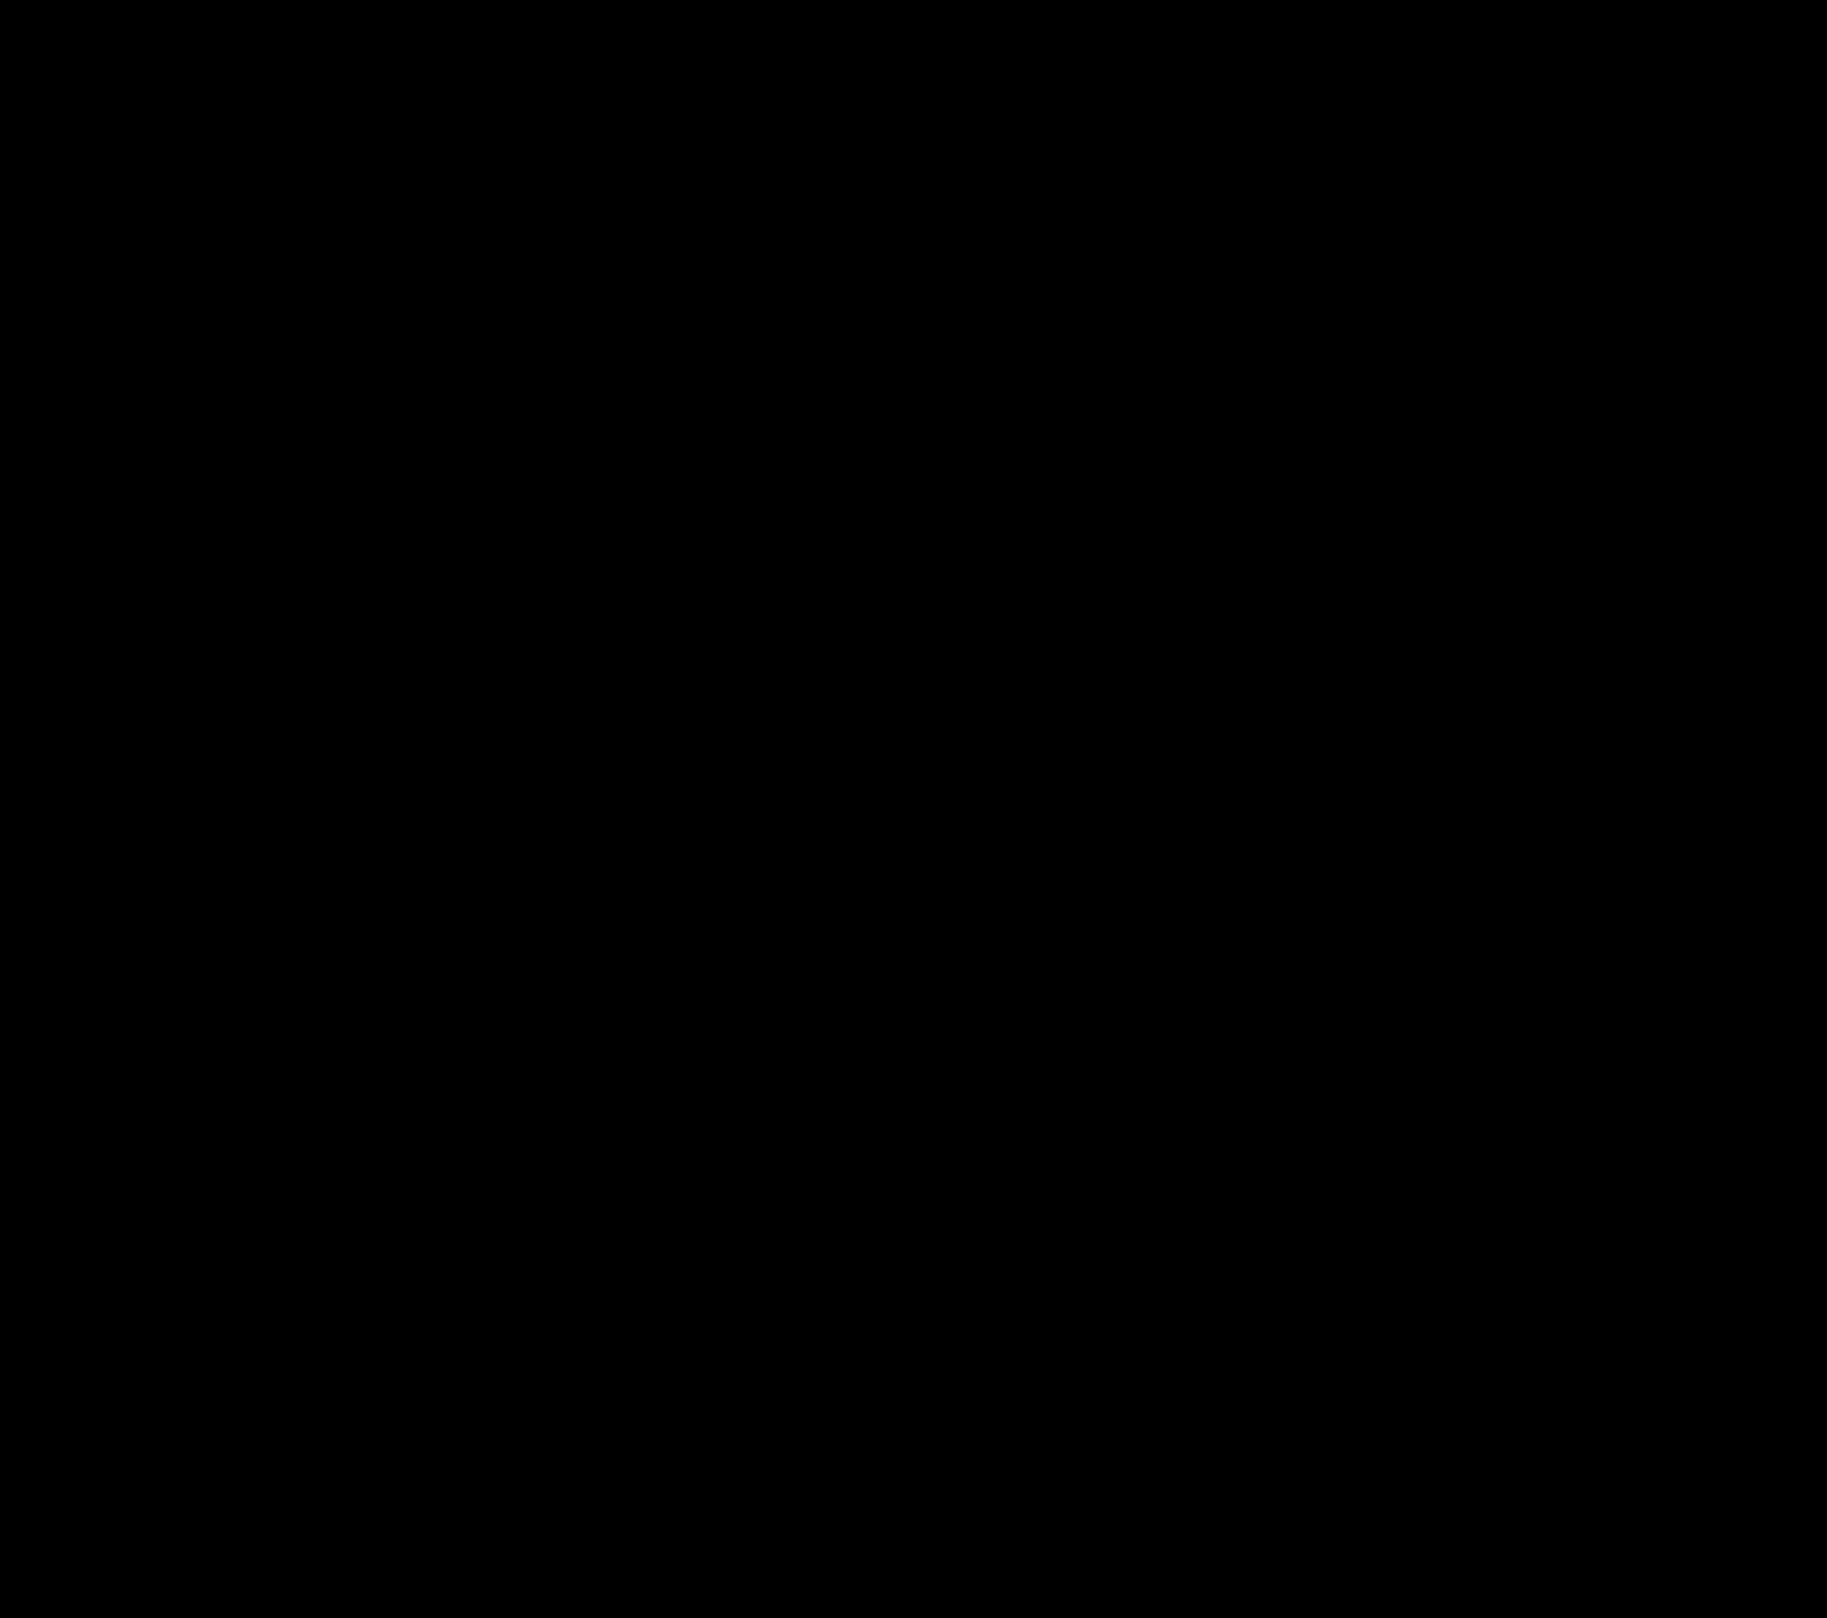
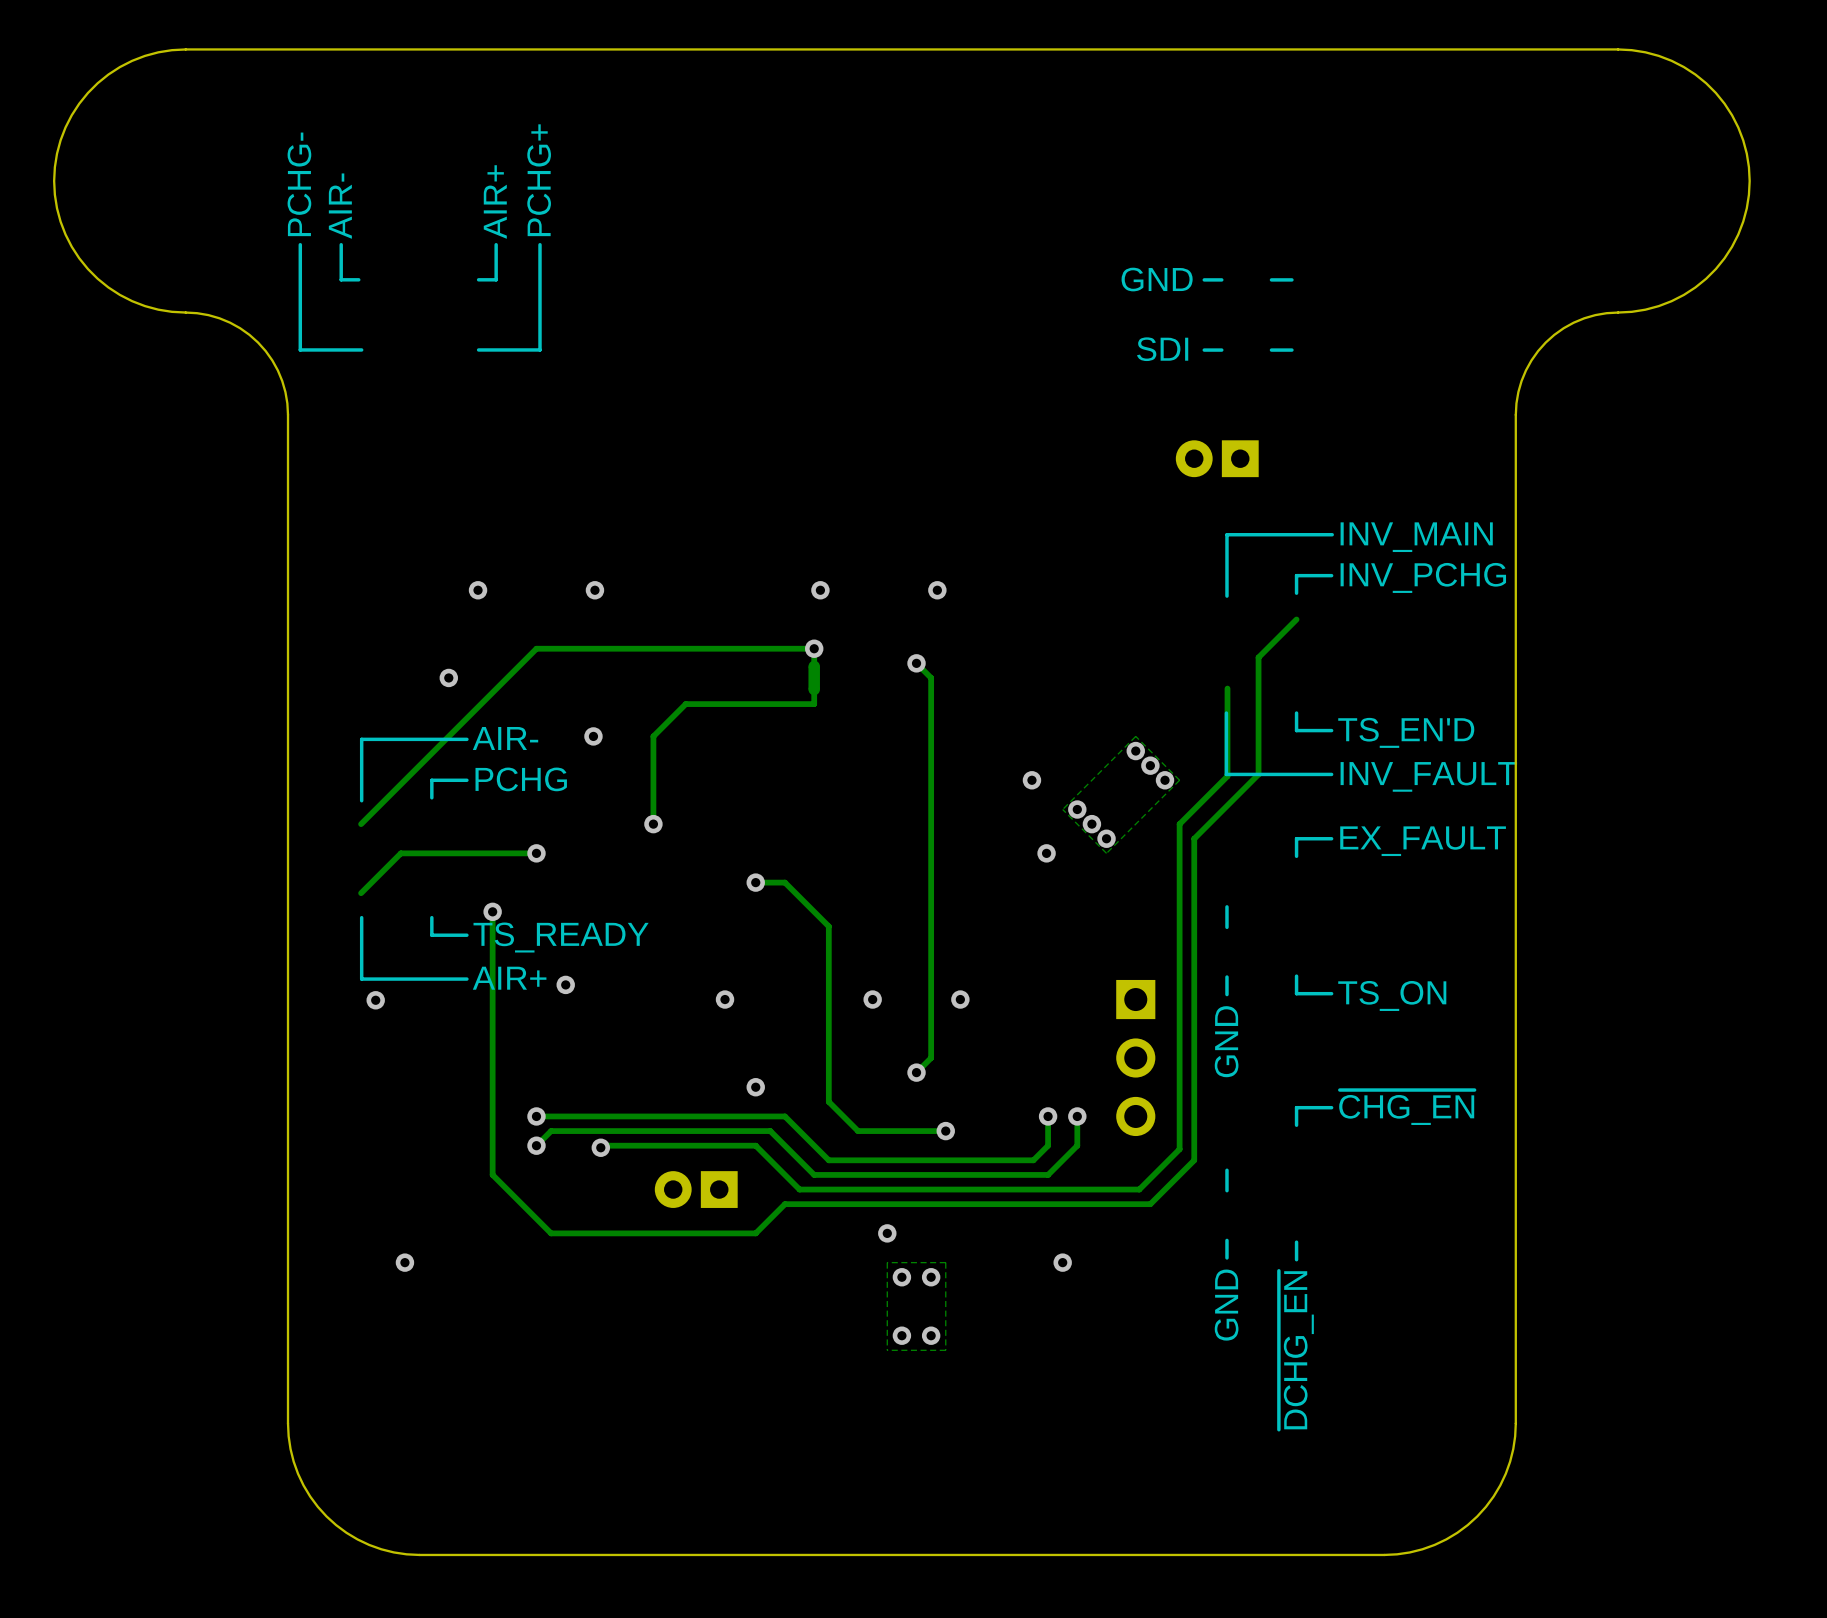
board edge: none -> (1618, 49) (185, 49) (158, 52) (132, 60) (108, 74) (87, 92) (65, 127) (57, 153) (54, 181) (60, 221) (79, 258) (97, 278) (132, 301) (158, 309) (208, 315) (240, 328) (265, 351) (277, 370) (285, 392) (288, 414) (288, 1423) (290, 1449) (298, 1473) (310, 1496) (336, 1525) (357, 1539) (381, 1549) (419, 1554) (1384, 1554) (1422, 1549) (1446, 1539) (1467, 1525) (1485, 1506) (1500, 1485) (1510, 1461) (1515, 1423) (1515, 414) (1518, 392) (1531, 360) (1545, 342) (1563, 328) (1595, 315) (1631, 311) (1658, 306) (1683, 294) (1706, 278) (1732, 246) (1743, 221) (1748, 194) (1748, 167) (1743, 140) (1732, 115) (1715, 92) (1695, 74) (1671, 60) (1645, 52) (1618, 49)
text: none -> PCHG+ (539, 180)
text: none -> PCHG- (299, 184)
text: none -> AIR+ (495, 202)
text: none -> AIR- (340, 206)
line: none -> (300, 244) (300, 349) (361, 349)
line: none -> (341, 244) (341, 279) (358, 279)
line: none -> (496, 244) (496, 279) (478, 279)
line: none -> (540, 244) (540, 349) (478, 349)
text: none -> GND (1157, 279)
line: none -> (1221, 279) (1204, 279)
line: none -> (1291, 279) (1271, 279)
text: none -> SDI (1162, 349)
line: none -> (1221, 350) (1204, 350)
line: none -> (1291, 350) (1271, 350)
part: none -> (1217, 458)
line: none -> (1332, 534) (1226, 534) (1226, 596)
text: none -> INV_MAIN (1416, 537)
line: none -> (1331, 575) (1296, 575) (1296, 593)
text: none -> INV_PCHG (1423, 577)
via: none -> (478, 590)
via: none -> (594, 590)
via: none -> (820, 590)
via: none -> (937, 590)
track: none -> (1296, 619) (1258, 657) (1258, 774) (1194, 838) (1194, 1160) (1150, 1204) (784, 1204) (755, 1233) (551, 1233) (492, 1174) (492, 911)
via: none -> (814, 648)
track: none -> (916, 663) (931, 677) (931, 1057) (916, 1072)
via: none -> (916, 663)
track: none -> (814, 666) (814, 648) (536, 648) (361, 824)
via: none -> (448, 677)
part: none -> (814, 677)
track: none -> (1227, 688) (1227, 776) (1179, 824) (1179, 1149) (1139, 1189) (799, 1189) (755, 1145) (602, 1145) (600, 1147)
track: none -> (814, 689) (814, 704) (685, 704) (653, 736) (653, 824)
line: none -> (1226, 713) (1226, 774) (1331, 774)
line: none -> (1296, 713) (1296, 730) (1331, 730)
text: none -> TS_EN'D (1406, 732)
via: none -> (593, 736)
zone outline: none -> (1135, 736) (1062, 809) (1106, 853) (1179, 780) (1135, 736)
text: none -> AIR- (505, 738)
line: none -> (466, 739) (361, 739) (361, 800)
via: none -> (1135, 751)
via: none -> (1150, 765)
text: none -> INV_FAULT (1428, 776)
text: none -> PCHG (521, 779)
line: none -> (466, 780) (431, 780) (431, 797)
via: none -> (1031, 780)
via: none -> (1165, 780)
via: none -> (1077, 809)
via: none -> (653, 824)
via: none -> (1091, 824)
via: none -> (1106, 838)
line: none -> (1331, 838) (1296, 838) (1296, 856)
text: none -> EX_FAULT (1423, 841)
track: none -> (536, 853) (400, 853) (361, 893)
via: none -> (536, 853)
via: none -> (1046, 853)
track: none -> (755, 882) (784, 882) (828, 926) (828, 1101) (858, 1131) (945, 1131)
via: none -> (755, 882)
line: none -> (1226, 906) (1226, 927)
via: none -> (492, 911)
line: none -> (361, 917) (361, 979) (466, 979)
line: none -> (431, 917) (431, 935) (466, 935)
text: none -> TS_READY (561, 937)
line: none -> (1296, 976) (1296, 993) (1331, 993)
line: none -> (1226, 977) (1226, 994)
text: none -> AIR+ (509, 978)
via: none -> (565, 984)
text: none -> TS_ON (1392, 995)
via: none -> (725, 999)
via: none -> (872, 999)
via: none -> (960, 999)
via: none -> (375, 1000)
text: none -> GND (1226, 1041)
part: none -> (1135, 1057)
via: none -> (916, 1072)
via: none -> (755, 1087)
line: none -> (1331, 1107) (1296, 1107) (1296, 1125)
text: none -> ~{CHG_EN} (1406, 1107)
via: none -> (536, 1116)
track: none -> (1048, 1116) (1048, 1145) (1033, 1160) (828, 1160) (784, 1116) (536, 1116)
via: none -> (1048, 1116)
track: none -> (1077, 1116) (1077, 1145) (1048, 1174) (814, 1174) (770, 1131) (551, 1131) (536, 1145)
via: none -> (1077, 1116)
via: none -> (945, 1131)
via: none -> (536, 1145)
via: none -> (600, 1147)
line: none -> (1226, 1170) (1226, 1190)
part: none -> (696, 1189)
via: none -> (887, 1233)
line: none -> (1226, 1240) (1226, 1257)
line: none -> (1296, 1242) (1296, 1259)
via: none -> (404, 1262)
zone outline: none -> (945, 1262) (887, 1262) (887, 1350) (945, 1350) (945, 1262)
via: none -> (1062, 1262)
via: none -> (901, 1277)
via: none -> (931, 1277)
text: none -> GND (1226, 1305)
via: none -> (901, 1335)
via: none -> (931, 1335)
text: none -> ~{DCHG_EN} (1296, 1350)

